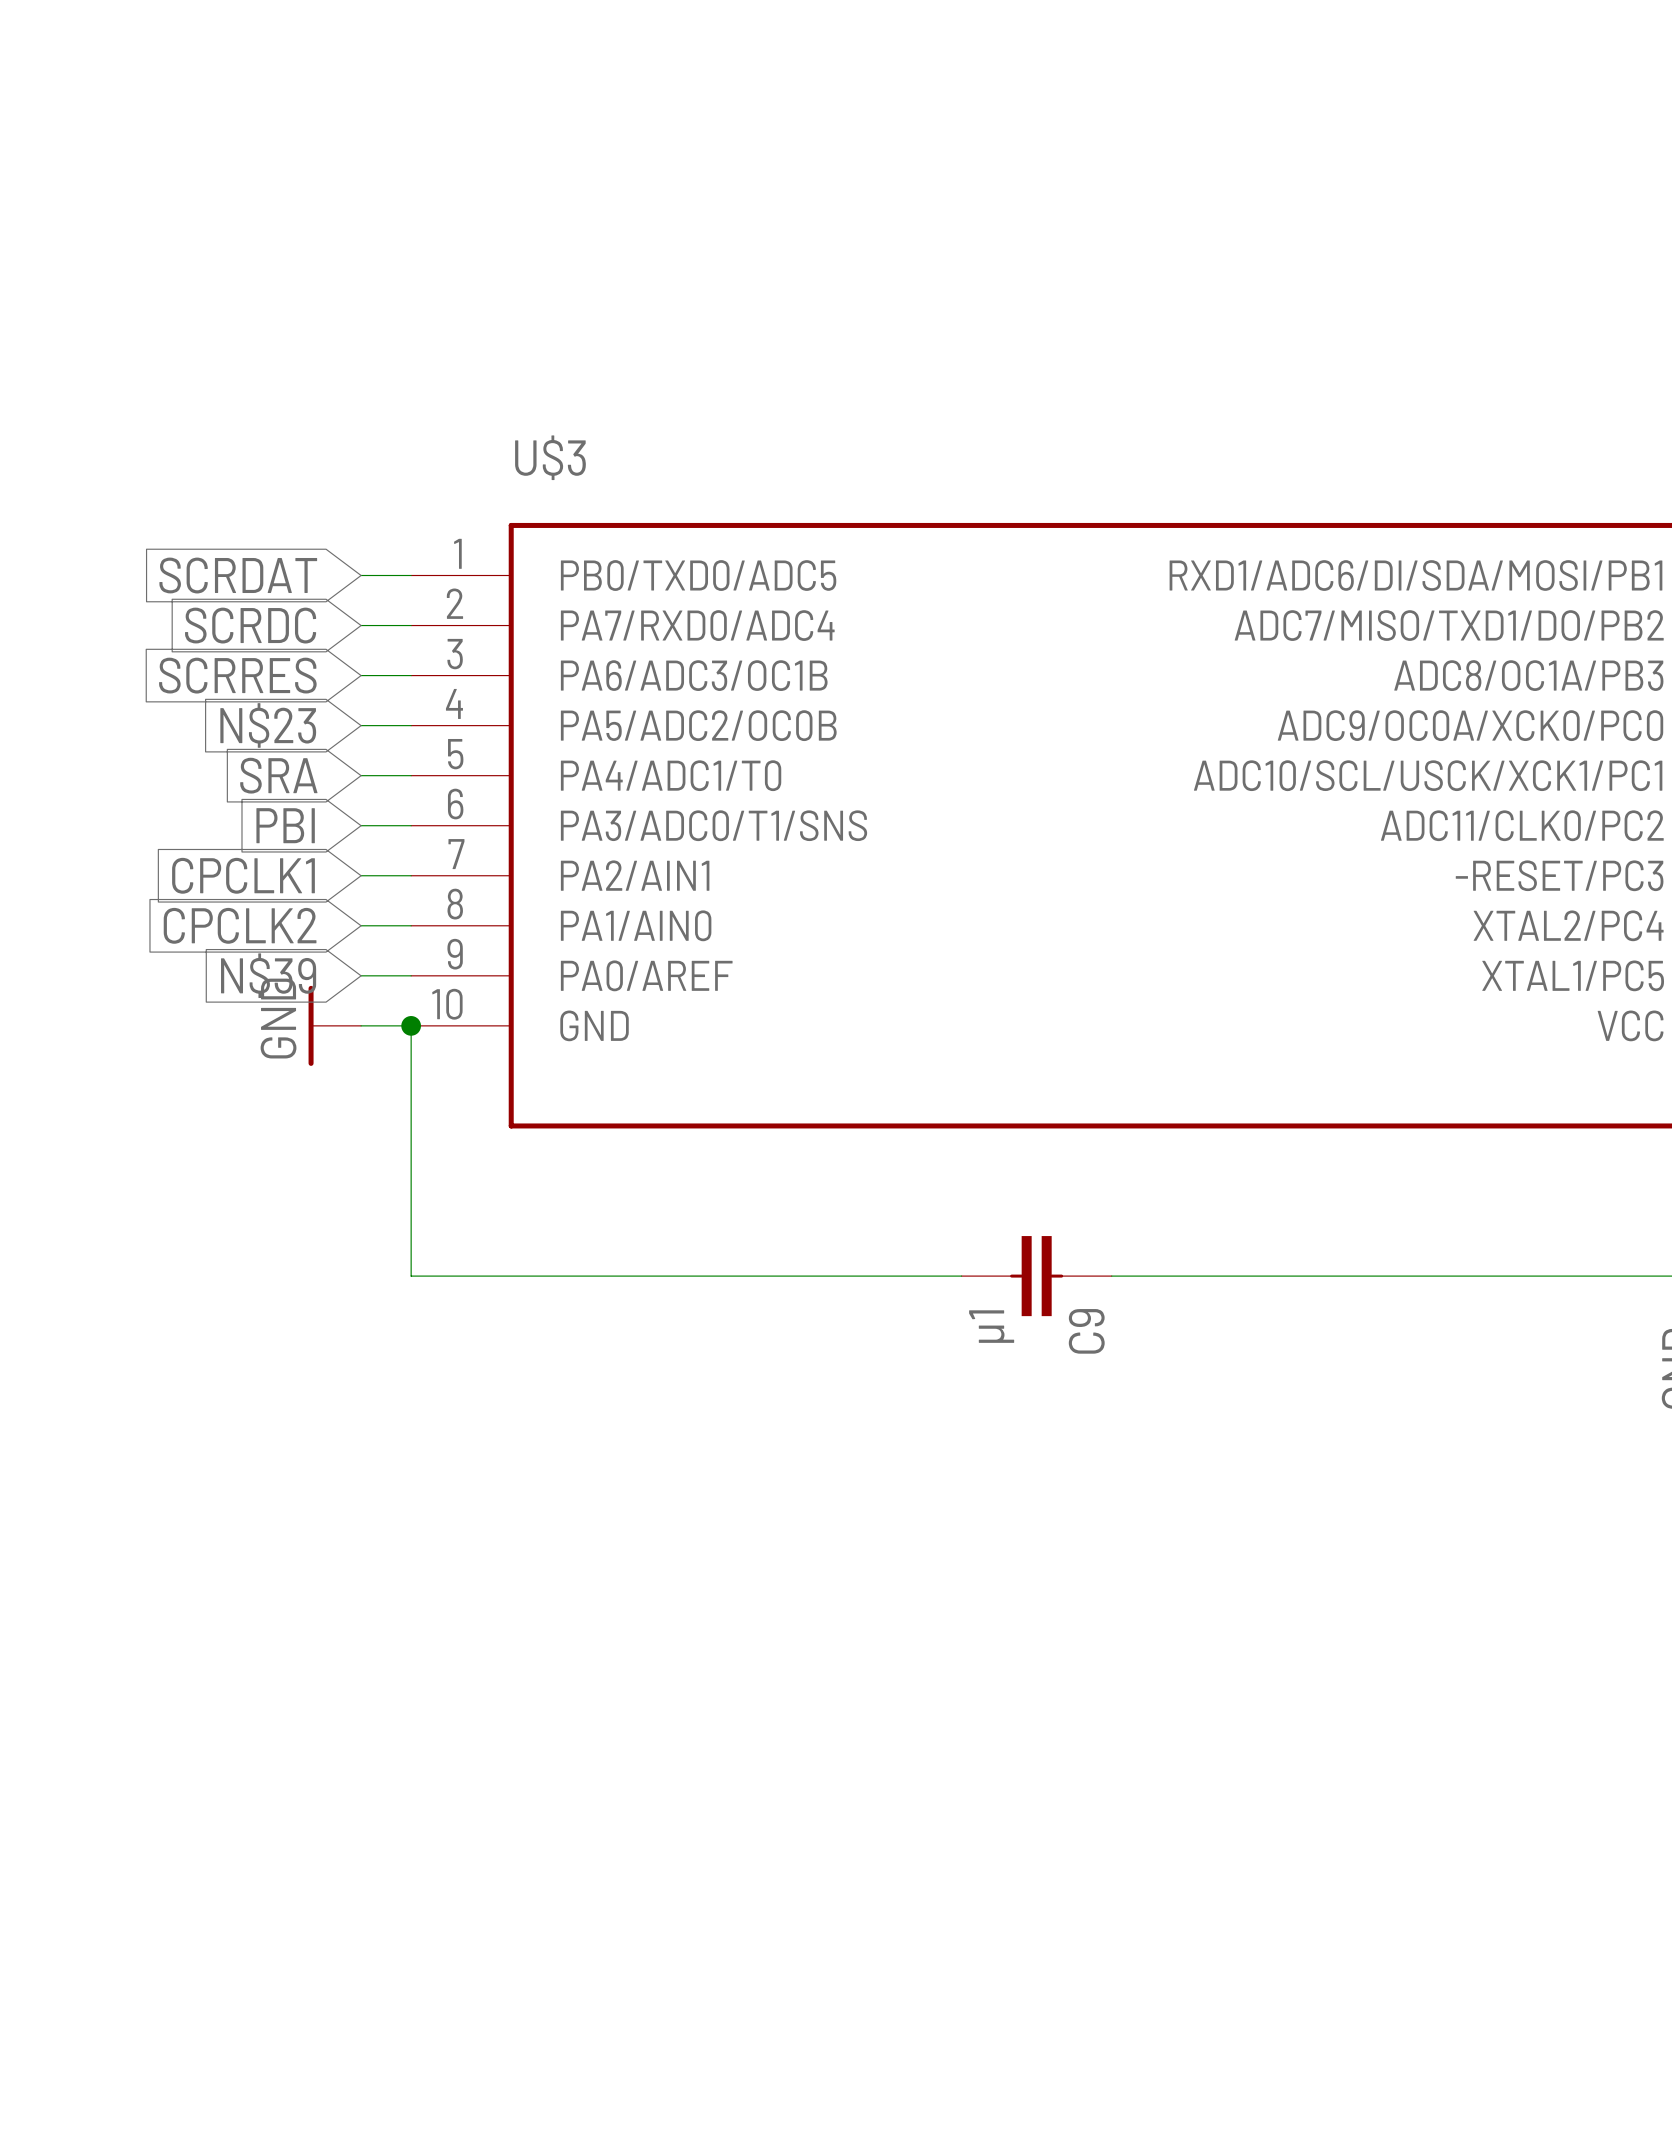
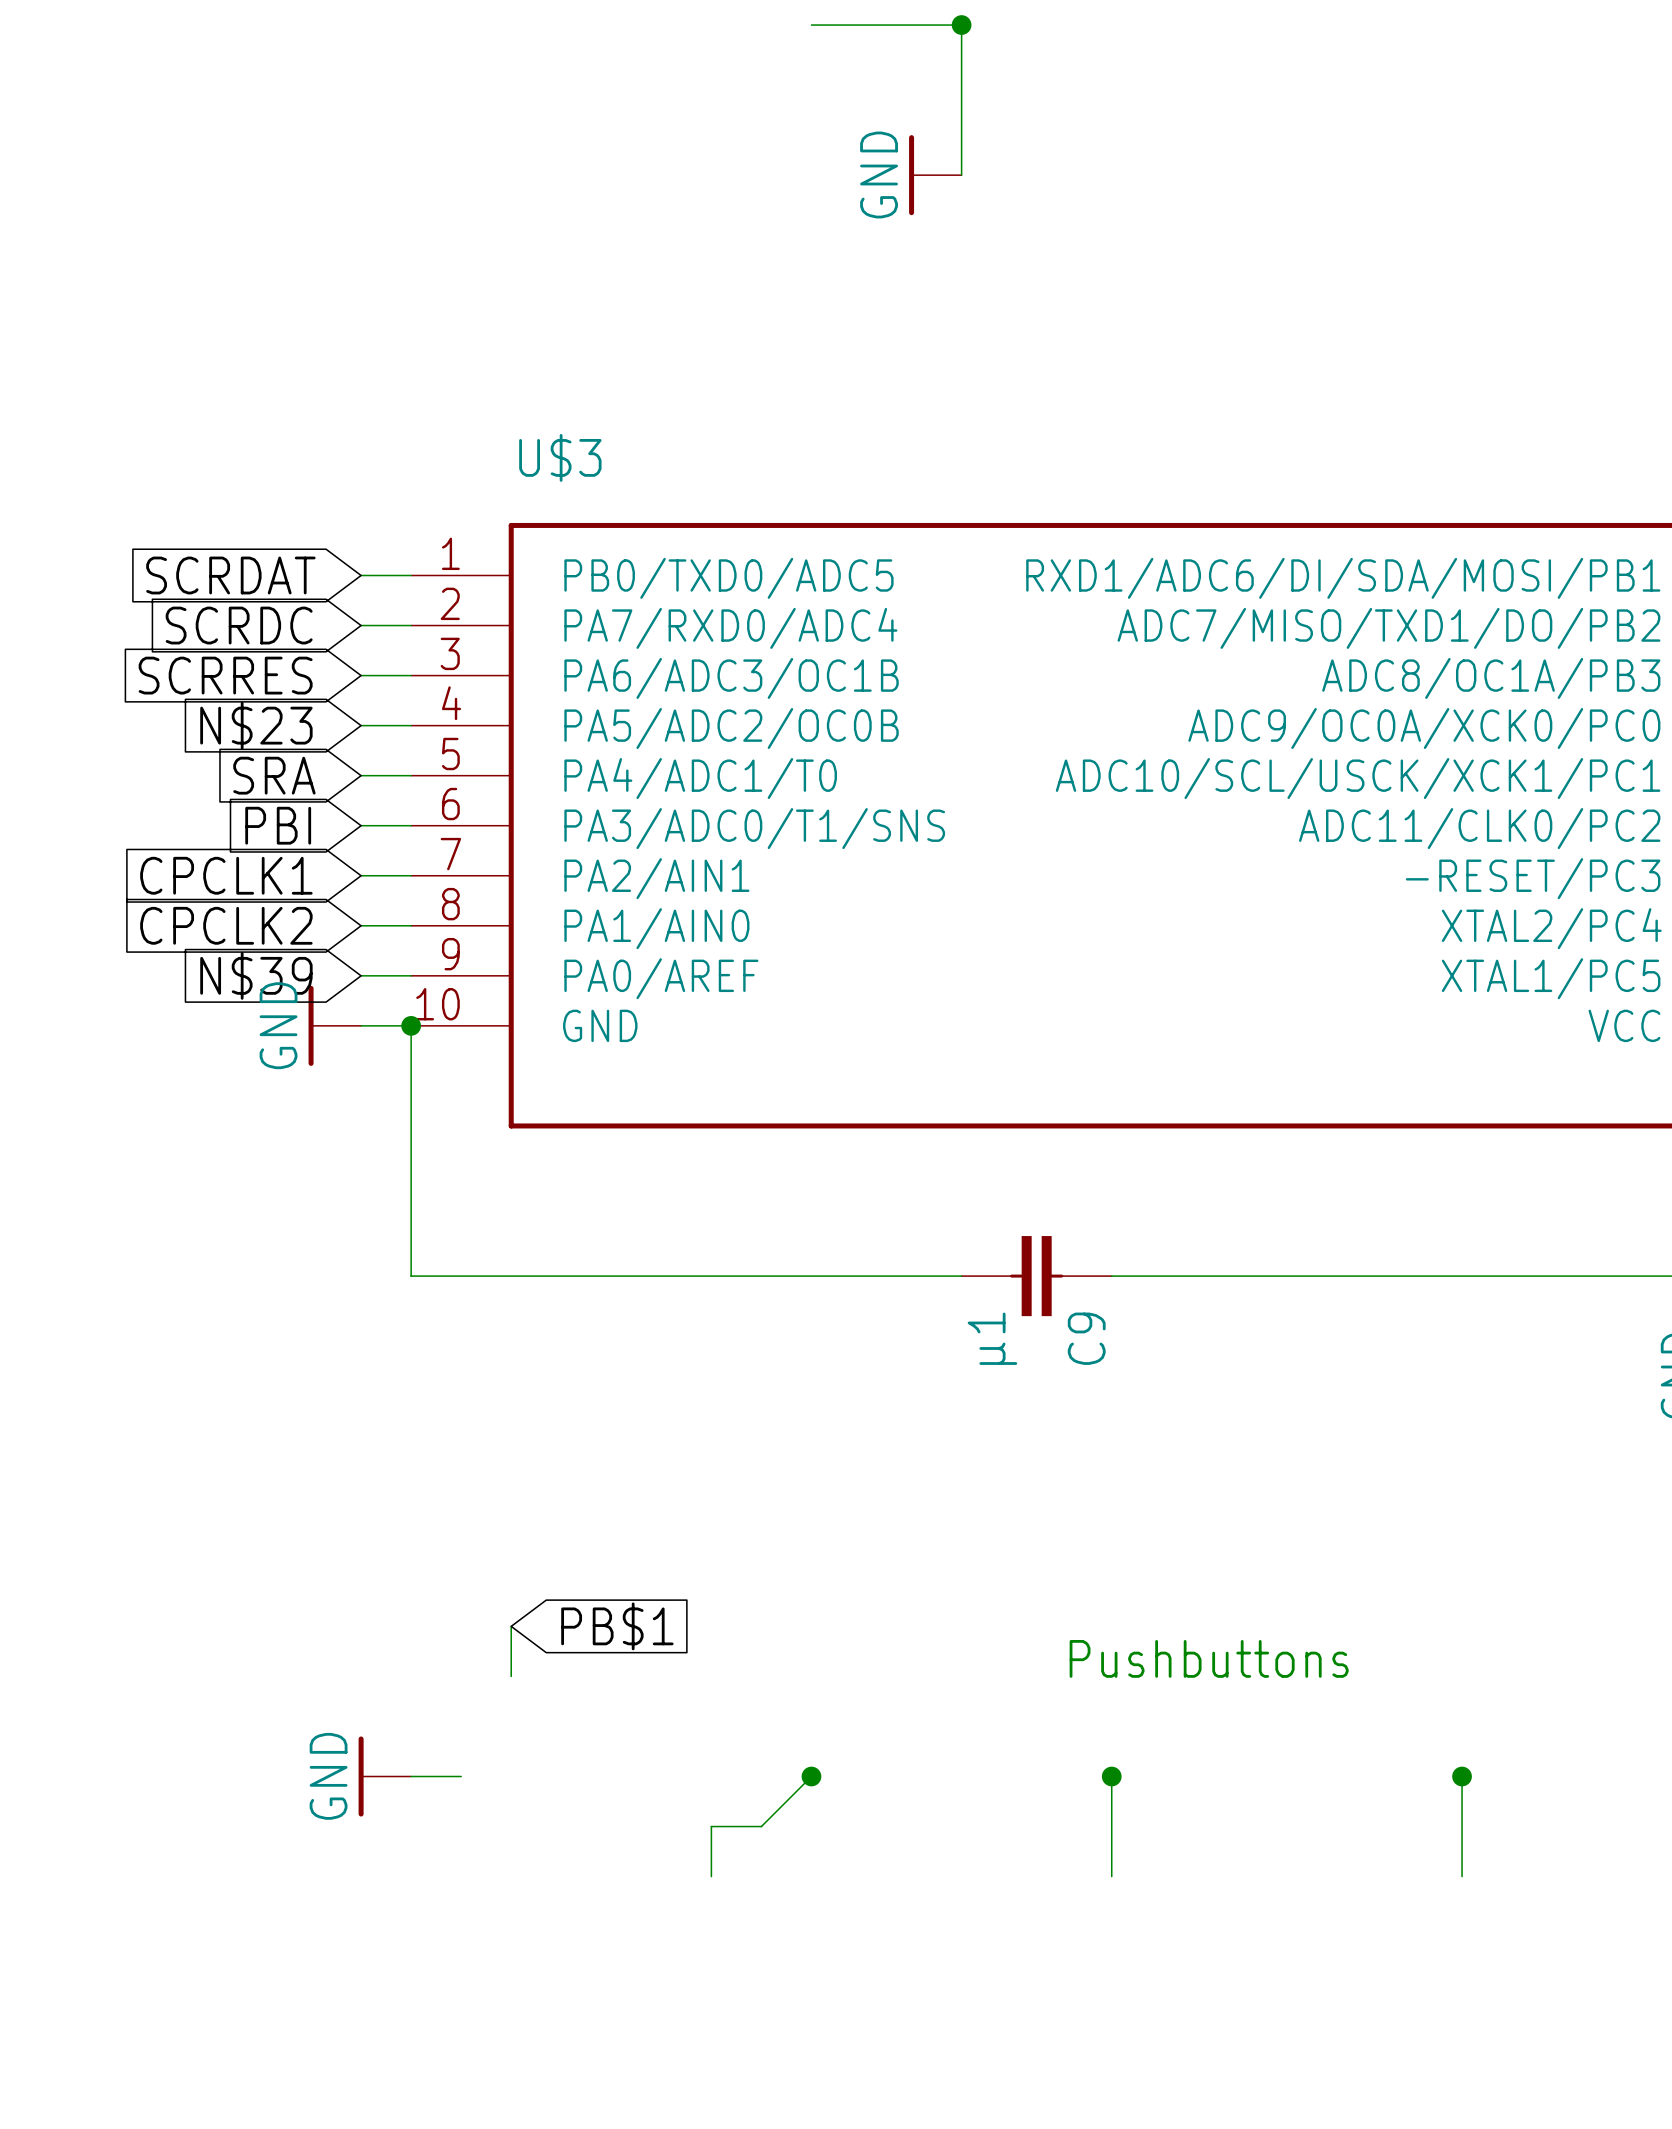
wire: none -> (811, 25) (961, 25) (961, 175)
junction: none -> (961, 25)
power symbol: none -> GND (935, 175)
wire: none -> (511, 1626) (511, 1676)
global label: none -> PB$1 (617, 1626)
text: none -> Pushbuttons (1209, 1658)
power symbol: none -> GND (384, 1776)
wire: none -> (411, 1776) (461, 1776)
wire: none -> (811, 1776) (761, 1826) (711, 1826) (711, 1876)
junction: none -> (811, 1776)
wire: none -> (1111, 1776) (1111, 1876)
junction: none -> (1111, 1776)
wire: none -> (1462, 1776) (1462, 1876)
junction: none -> (1462, 1776)

